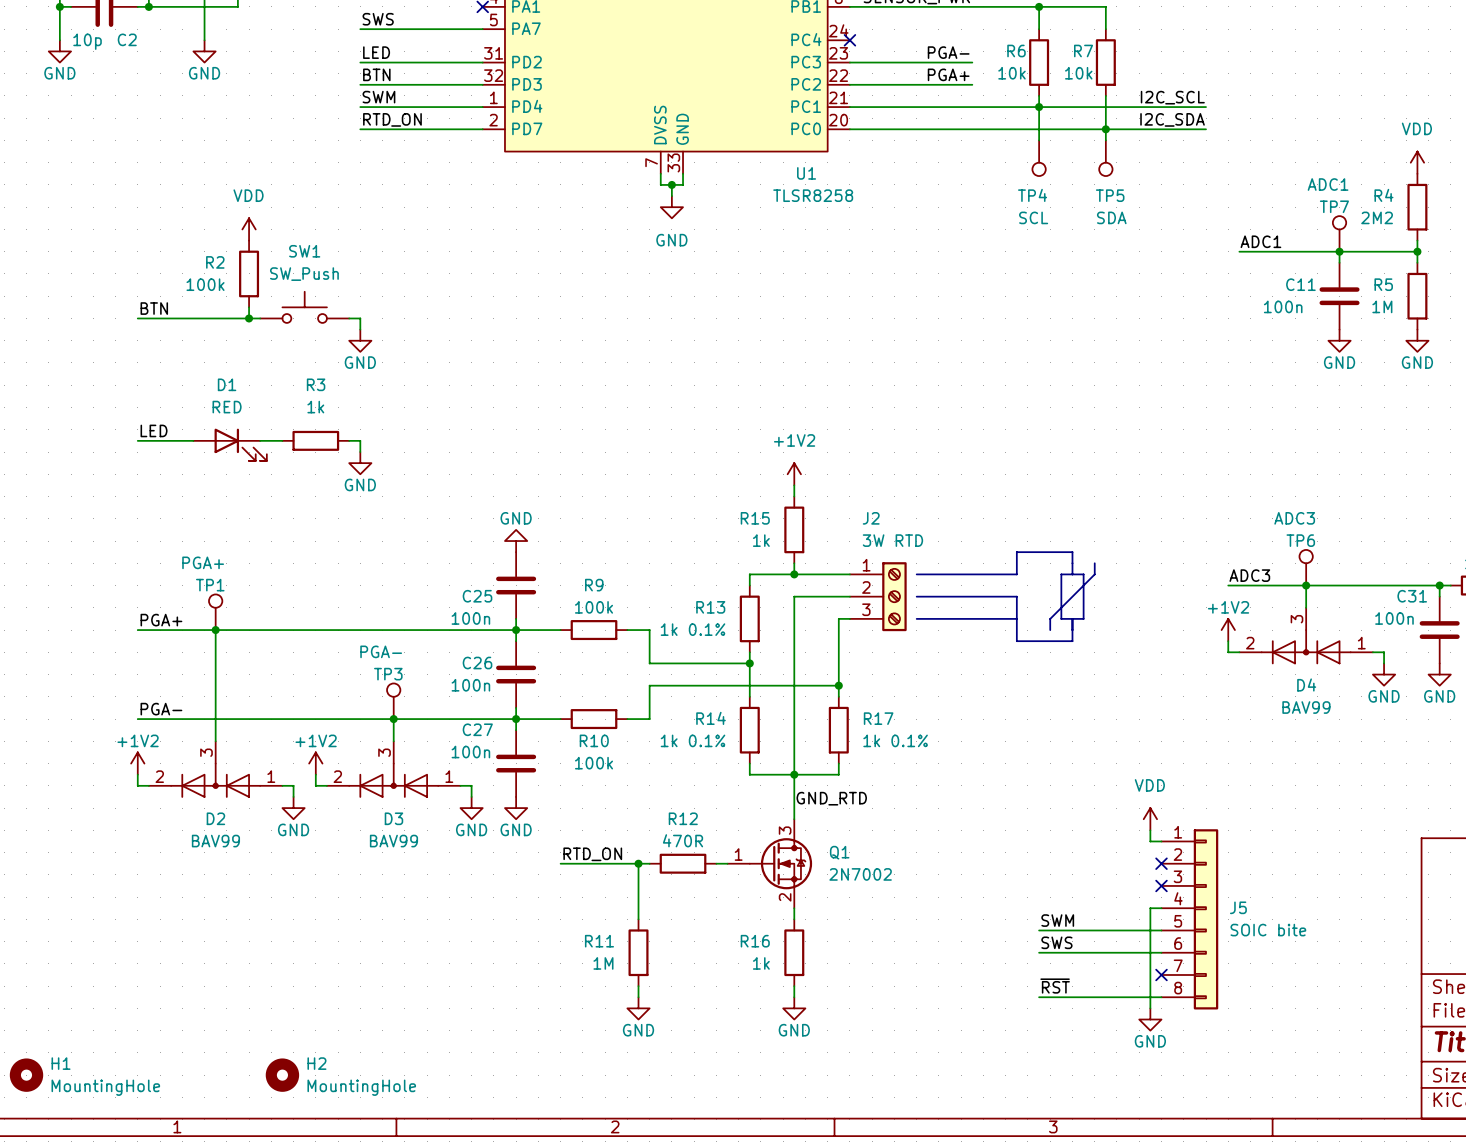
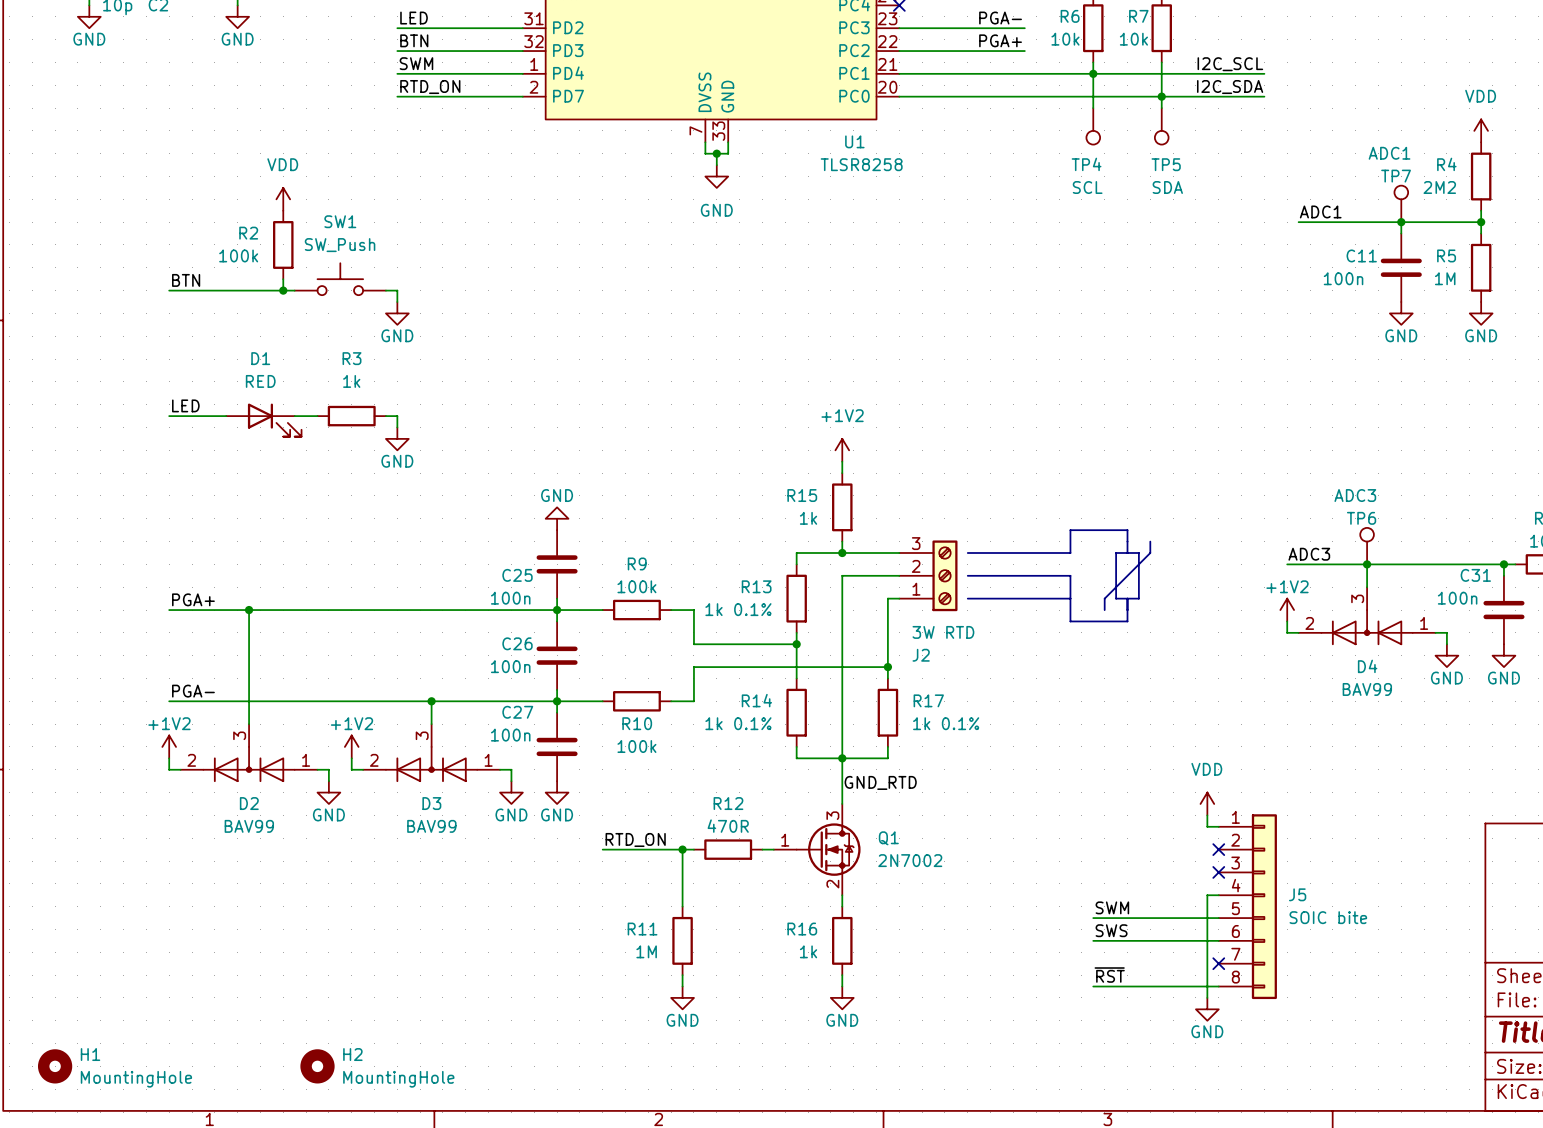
J2 flip: as is (894, 596) -> up-down (944, 575)
TP1: PGA+ (215, 612) -> none
TP3: PGA- (393, 701) -> none

